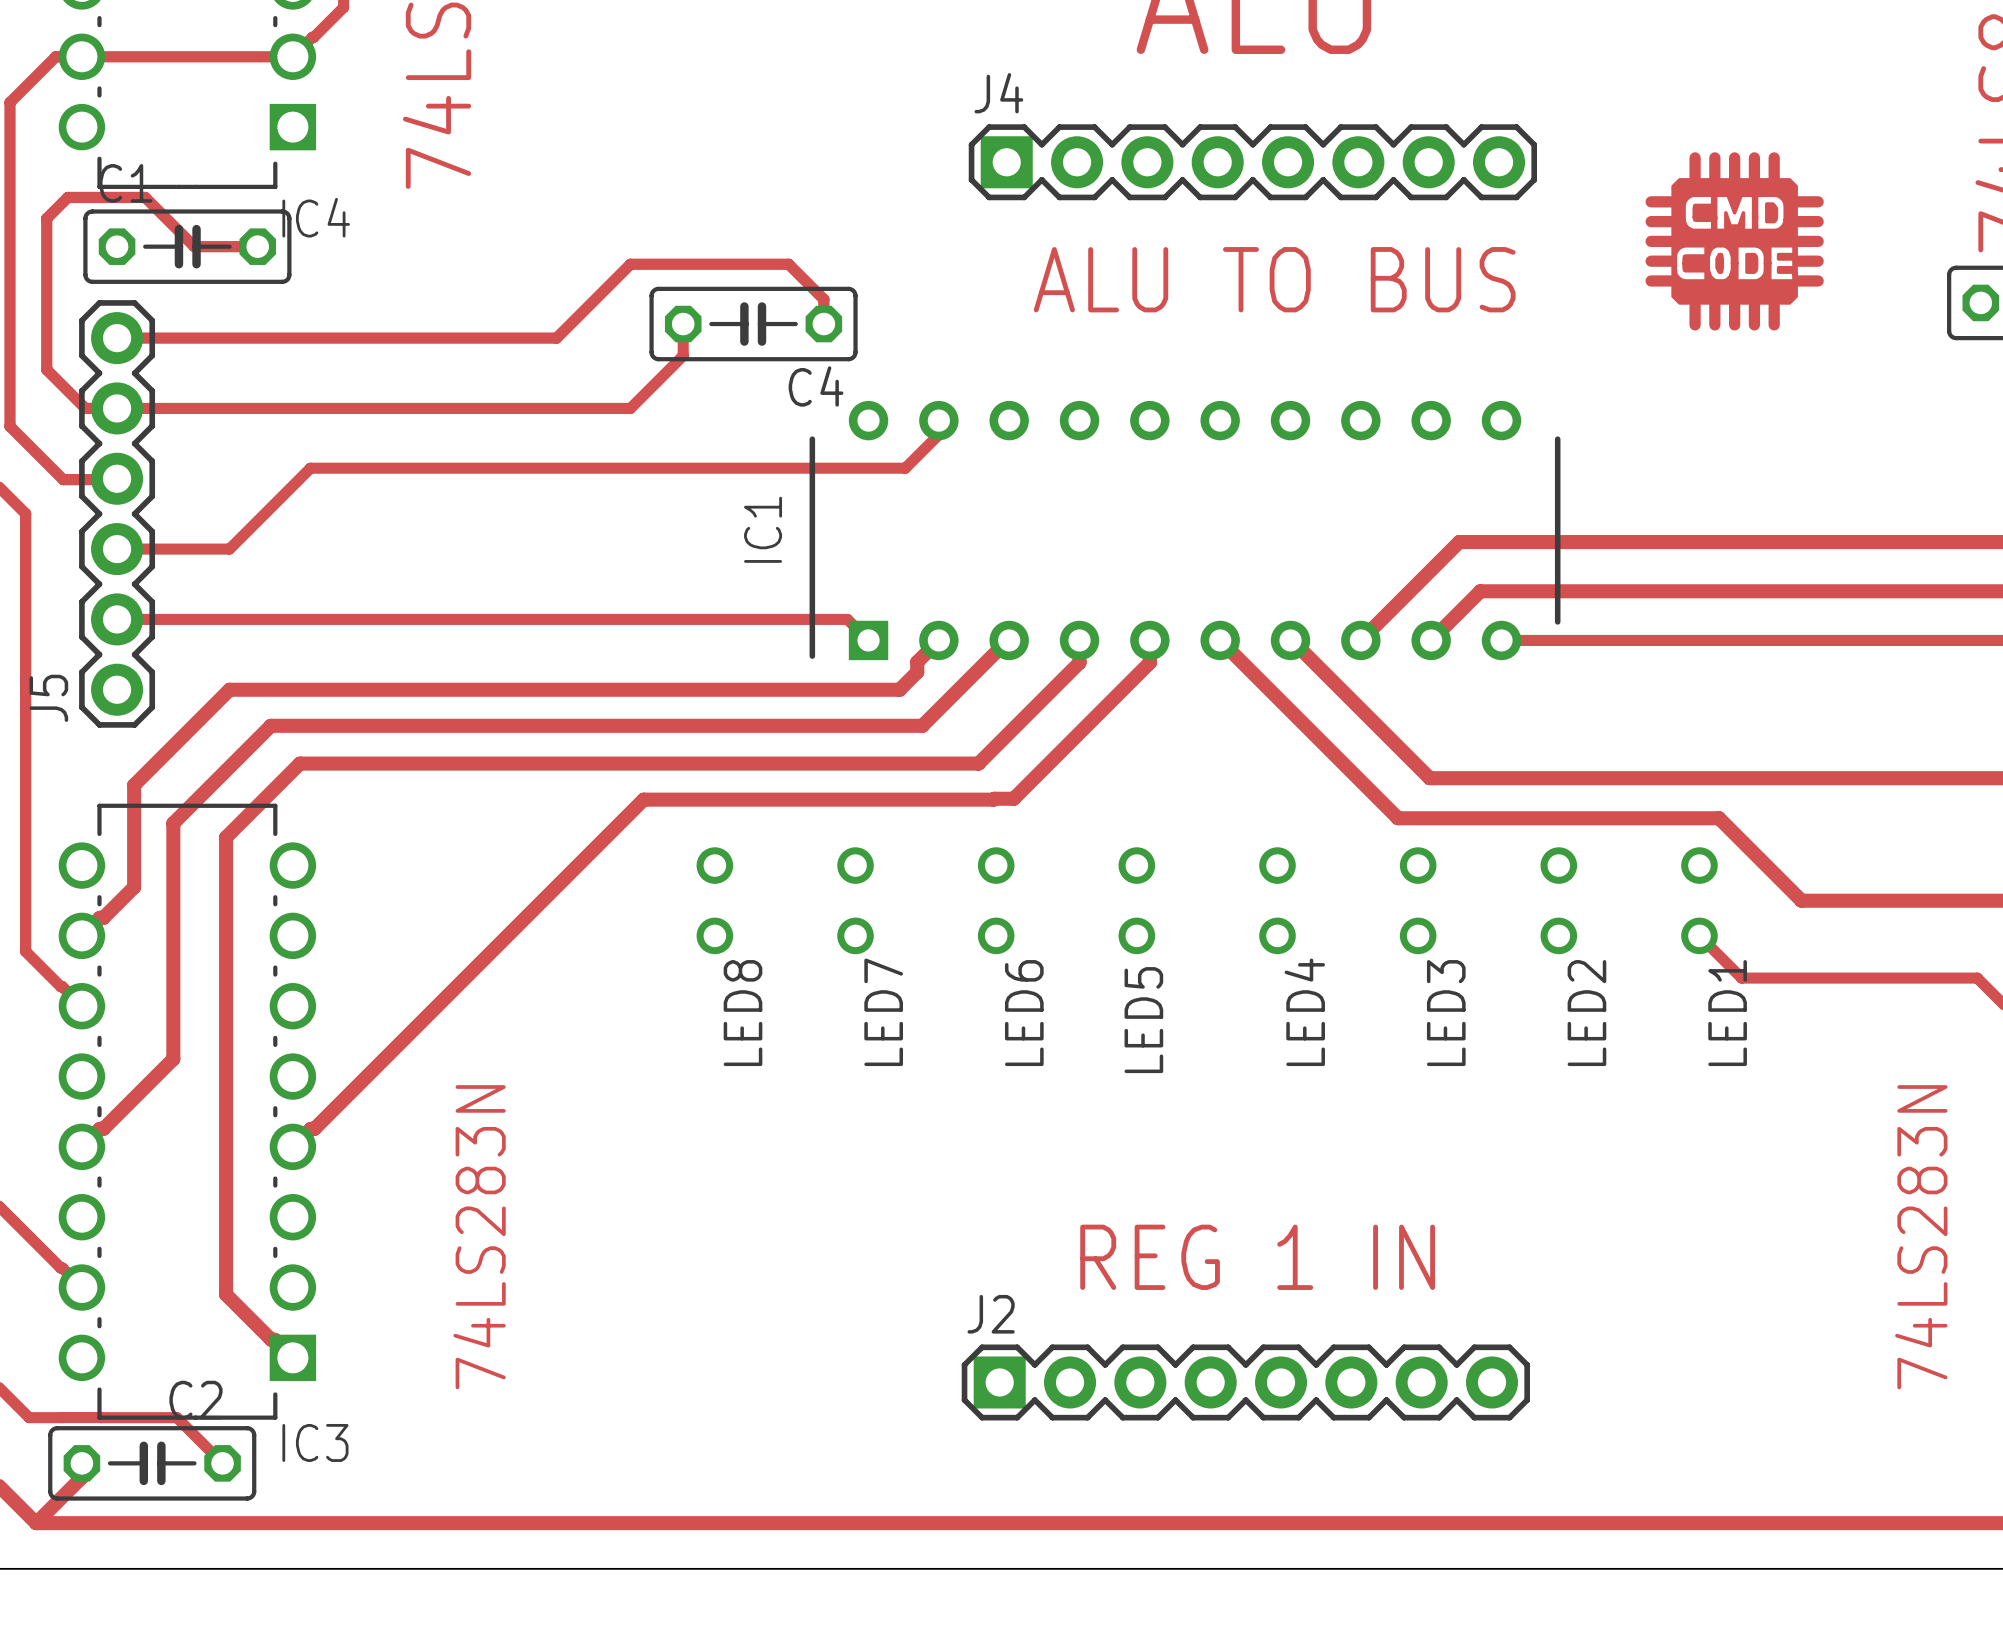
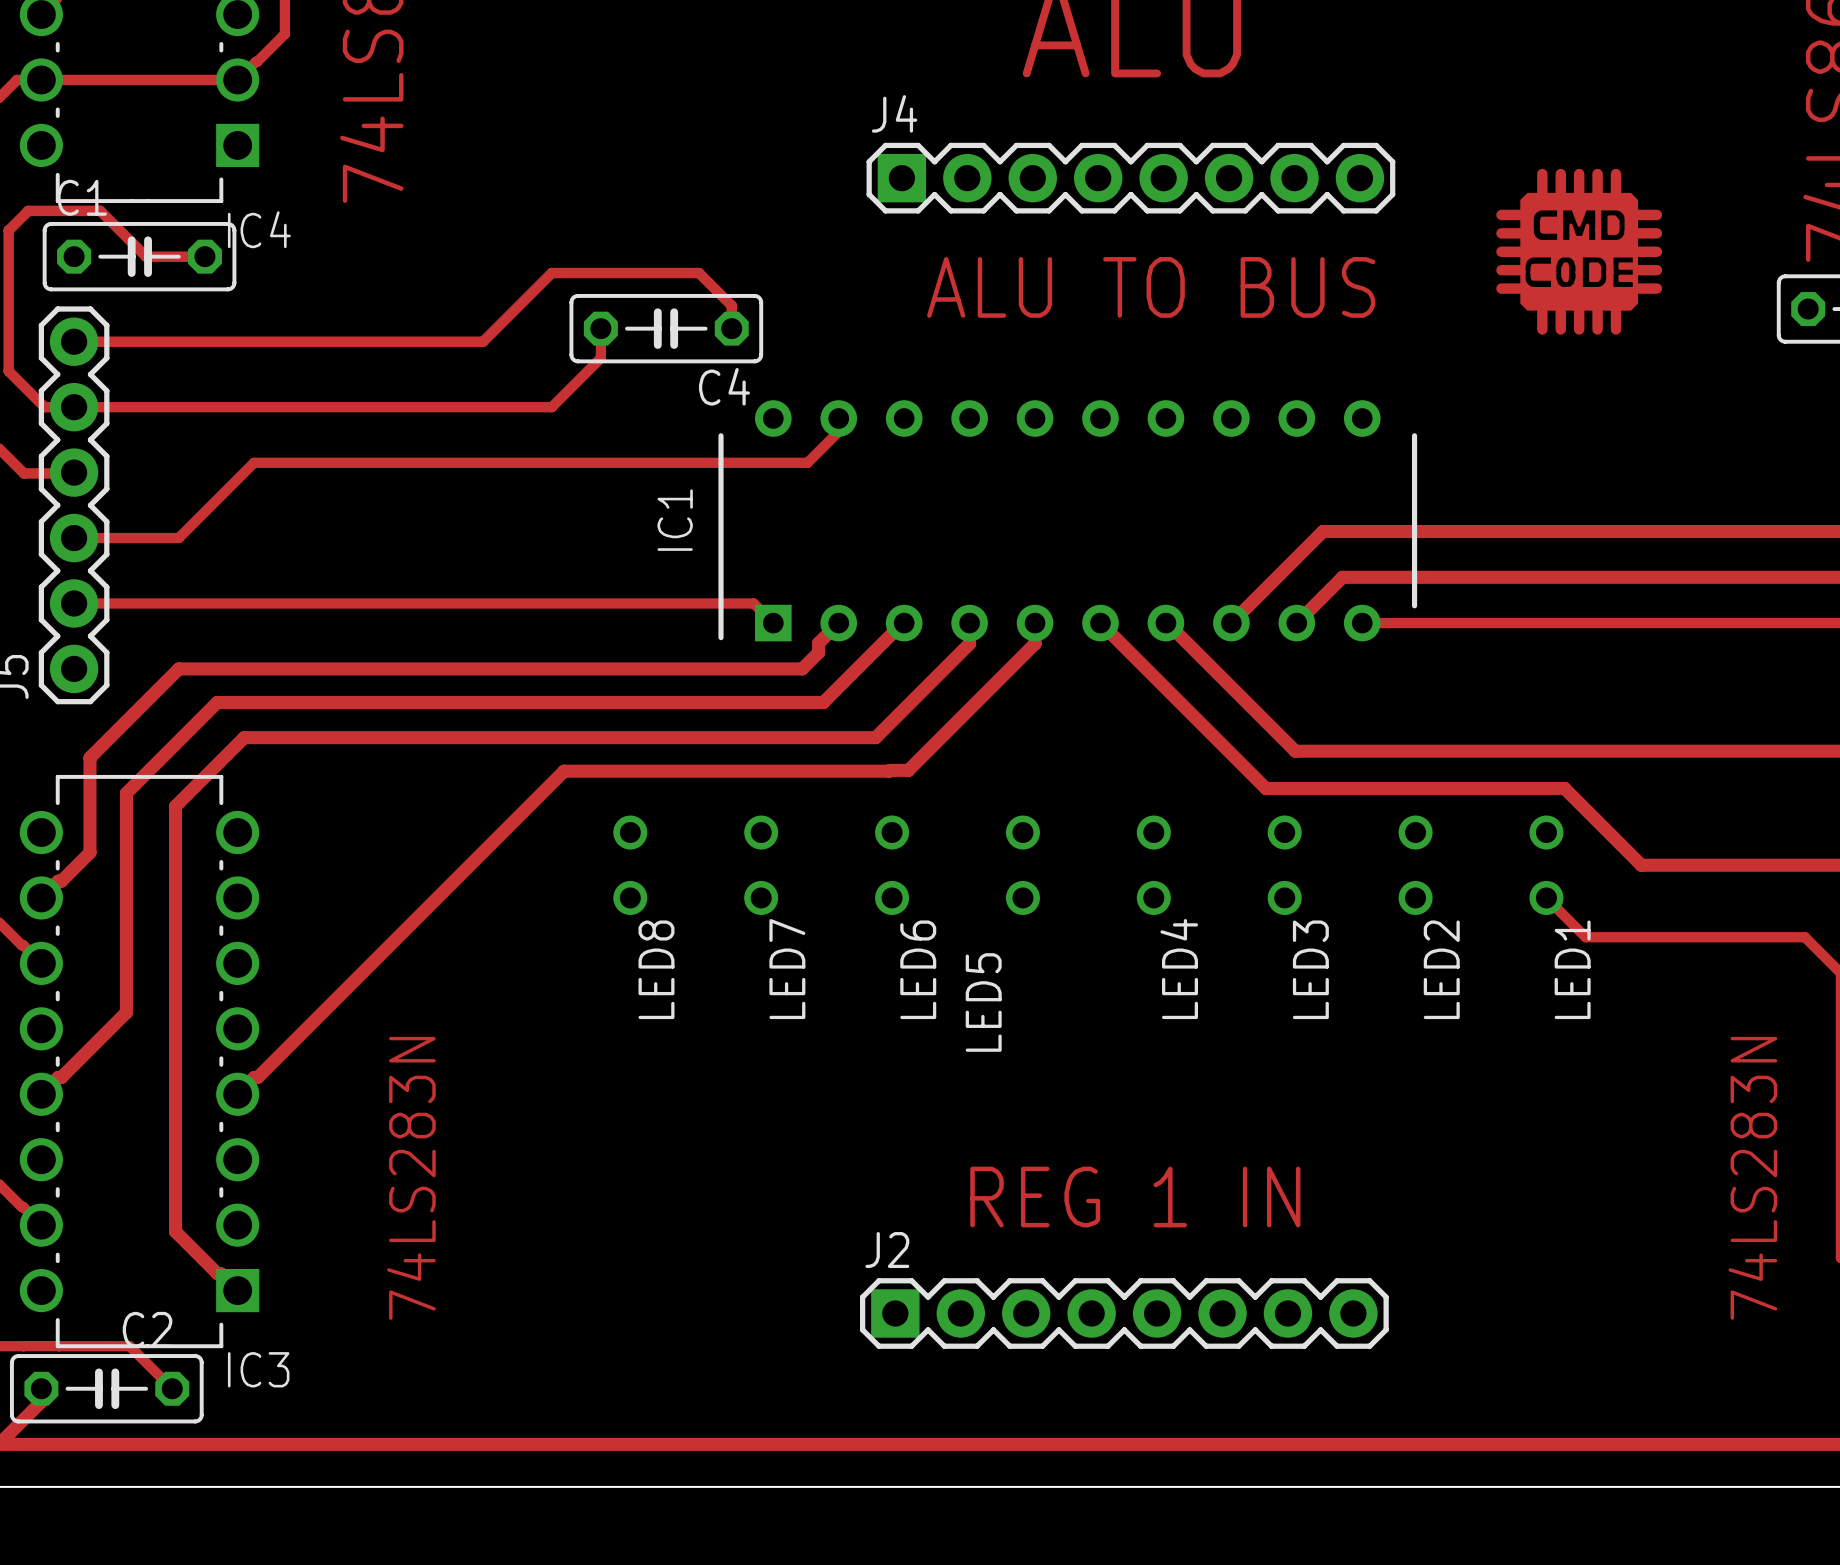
LED5 name position: LED5 (1143, 1020) -> LED5 (983, 1002)

